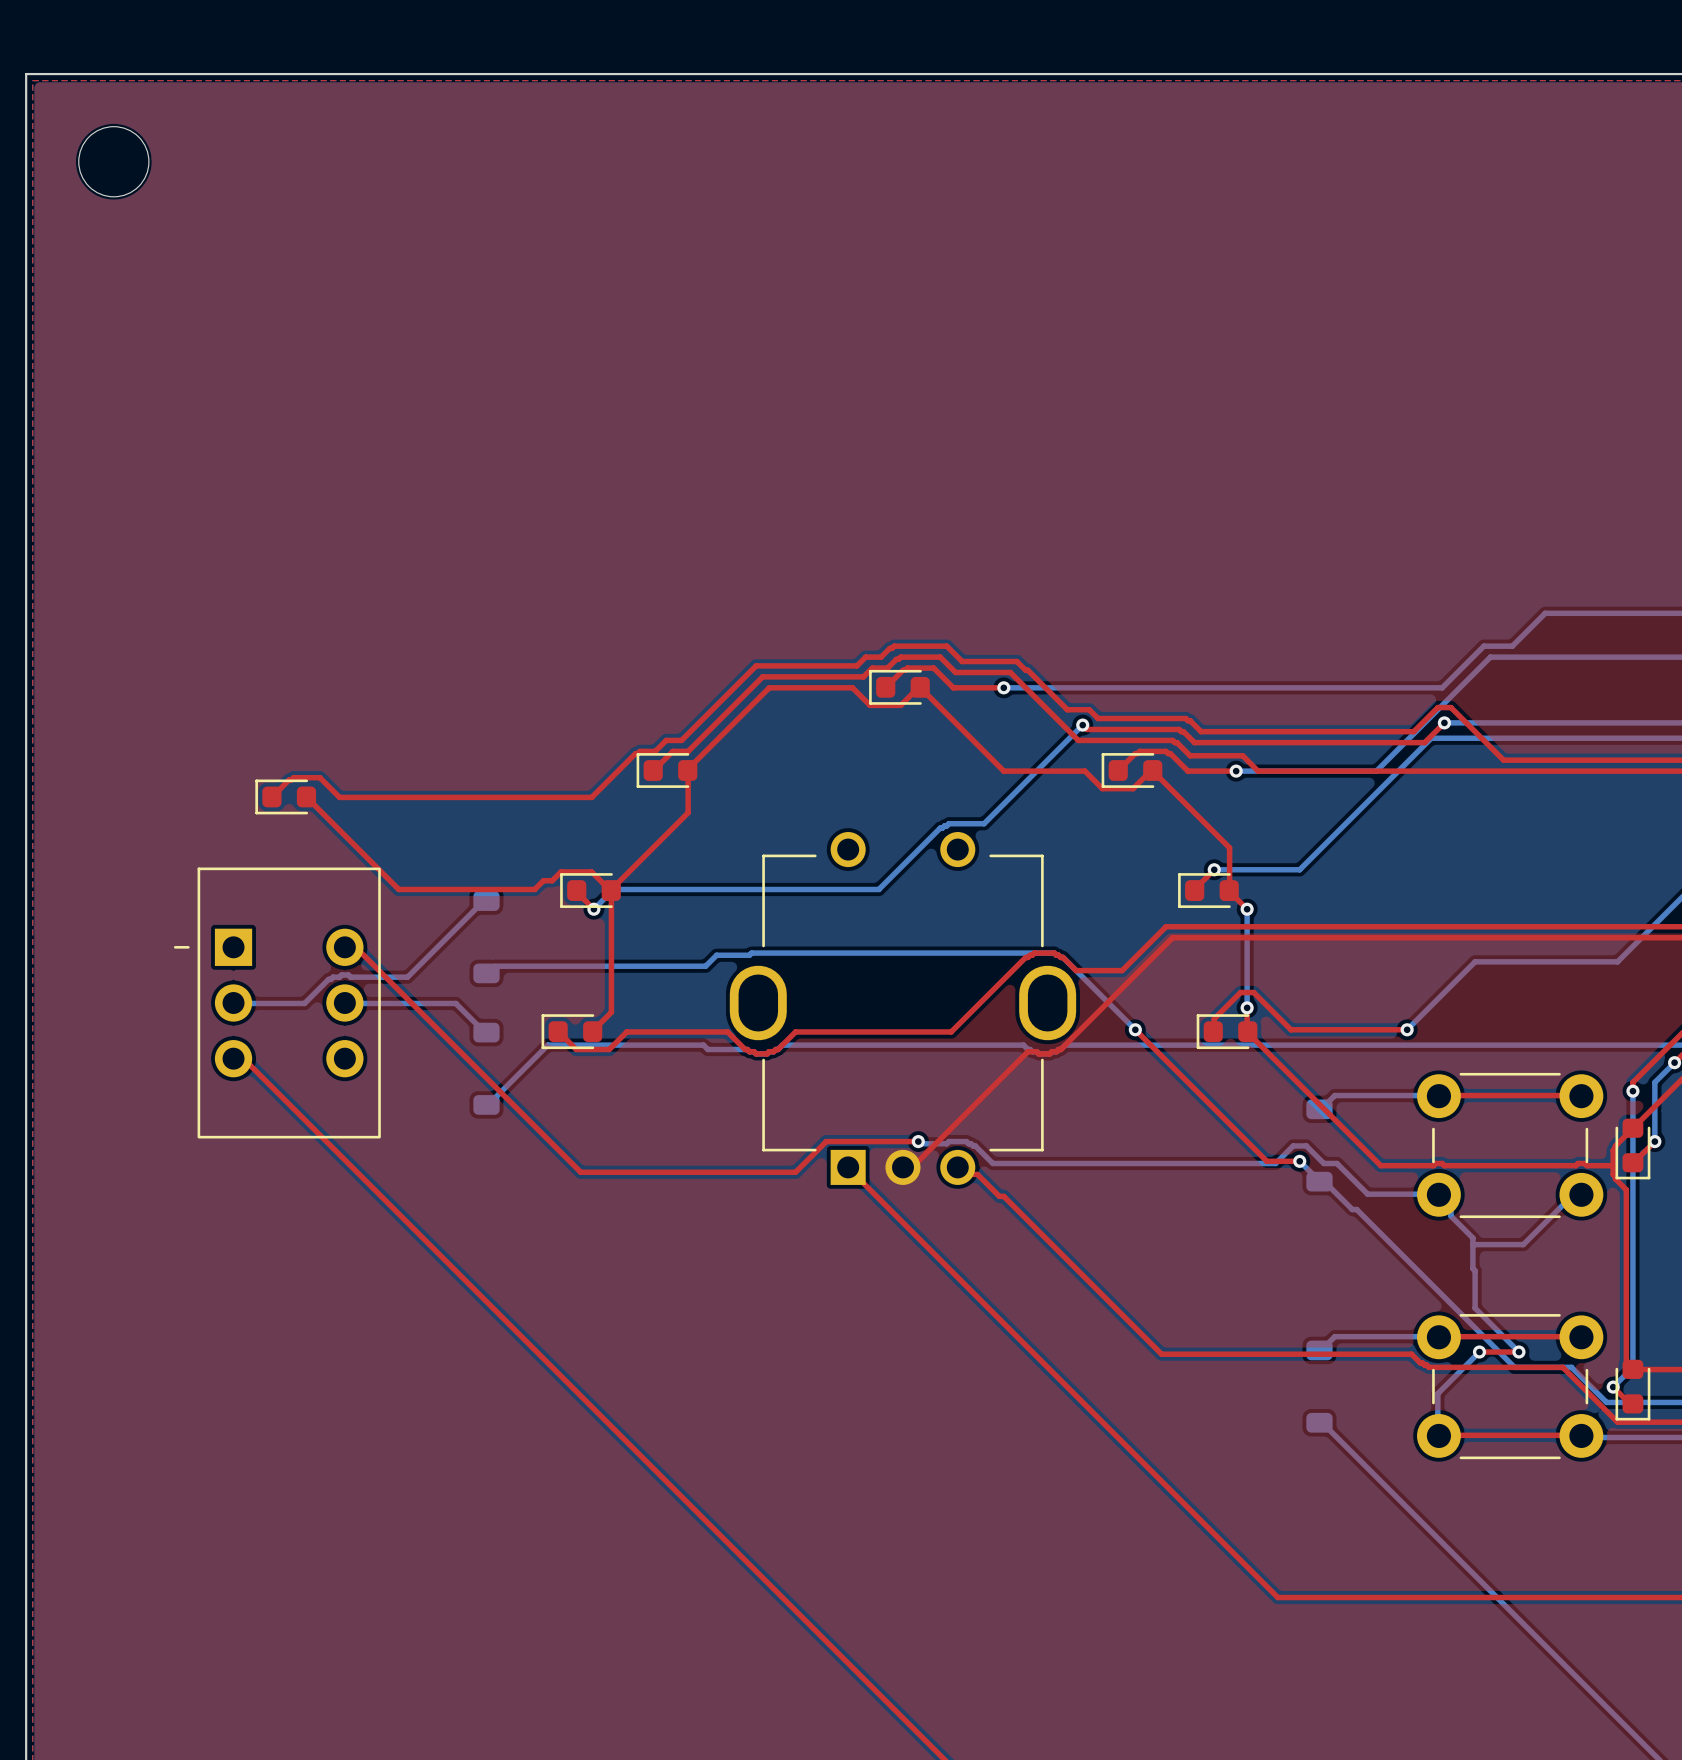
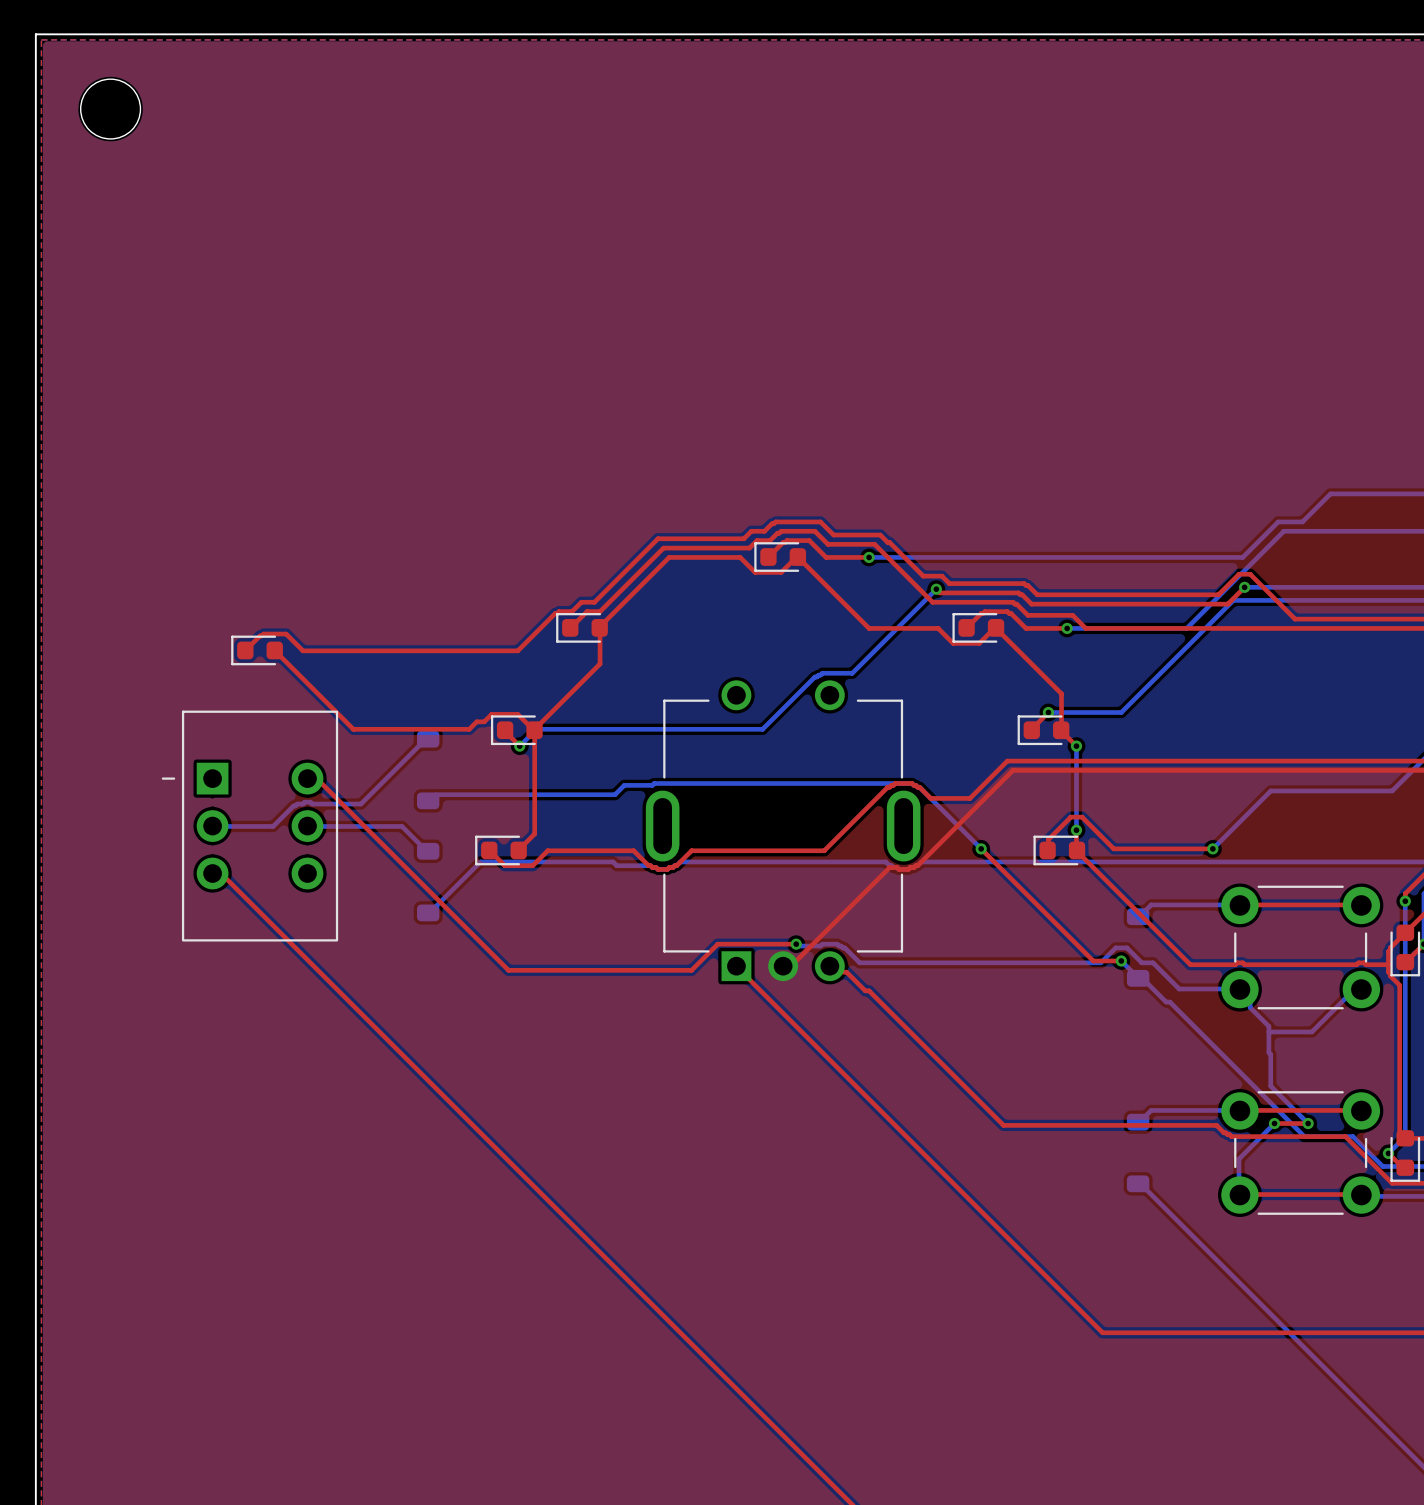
part footprint: [729, 832, 1077, 1185] -> [645, 680, 921, 982]

